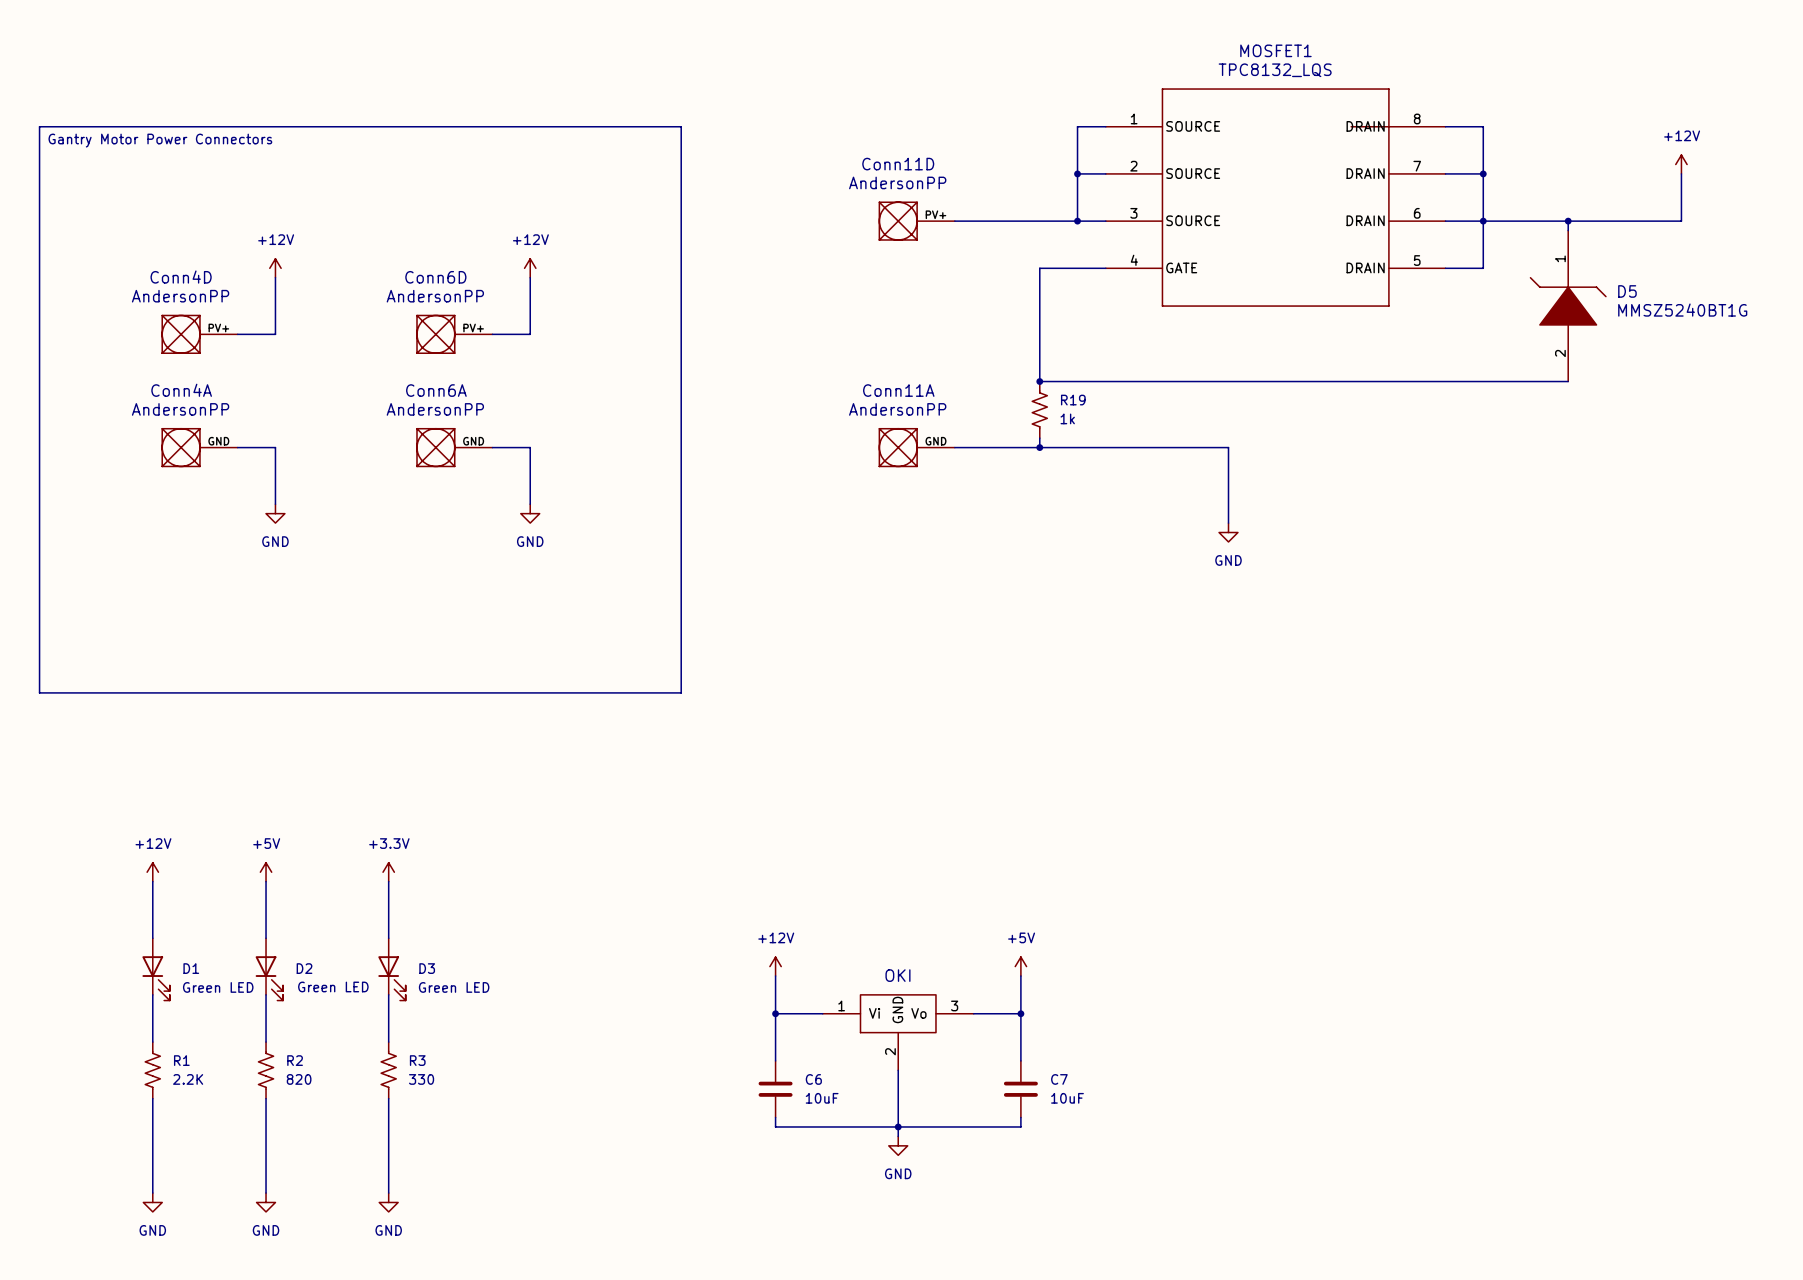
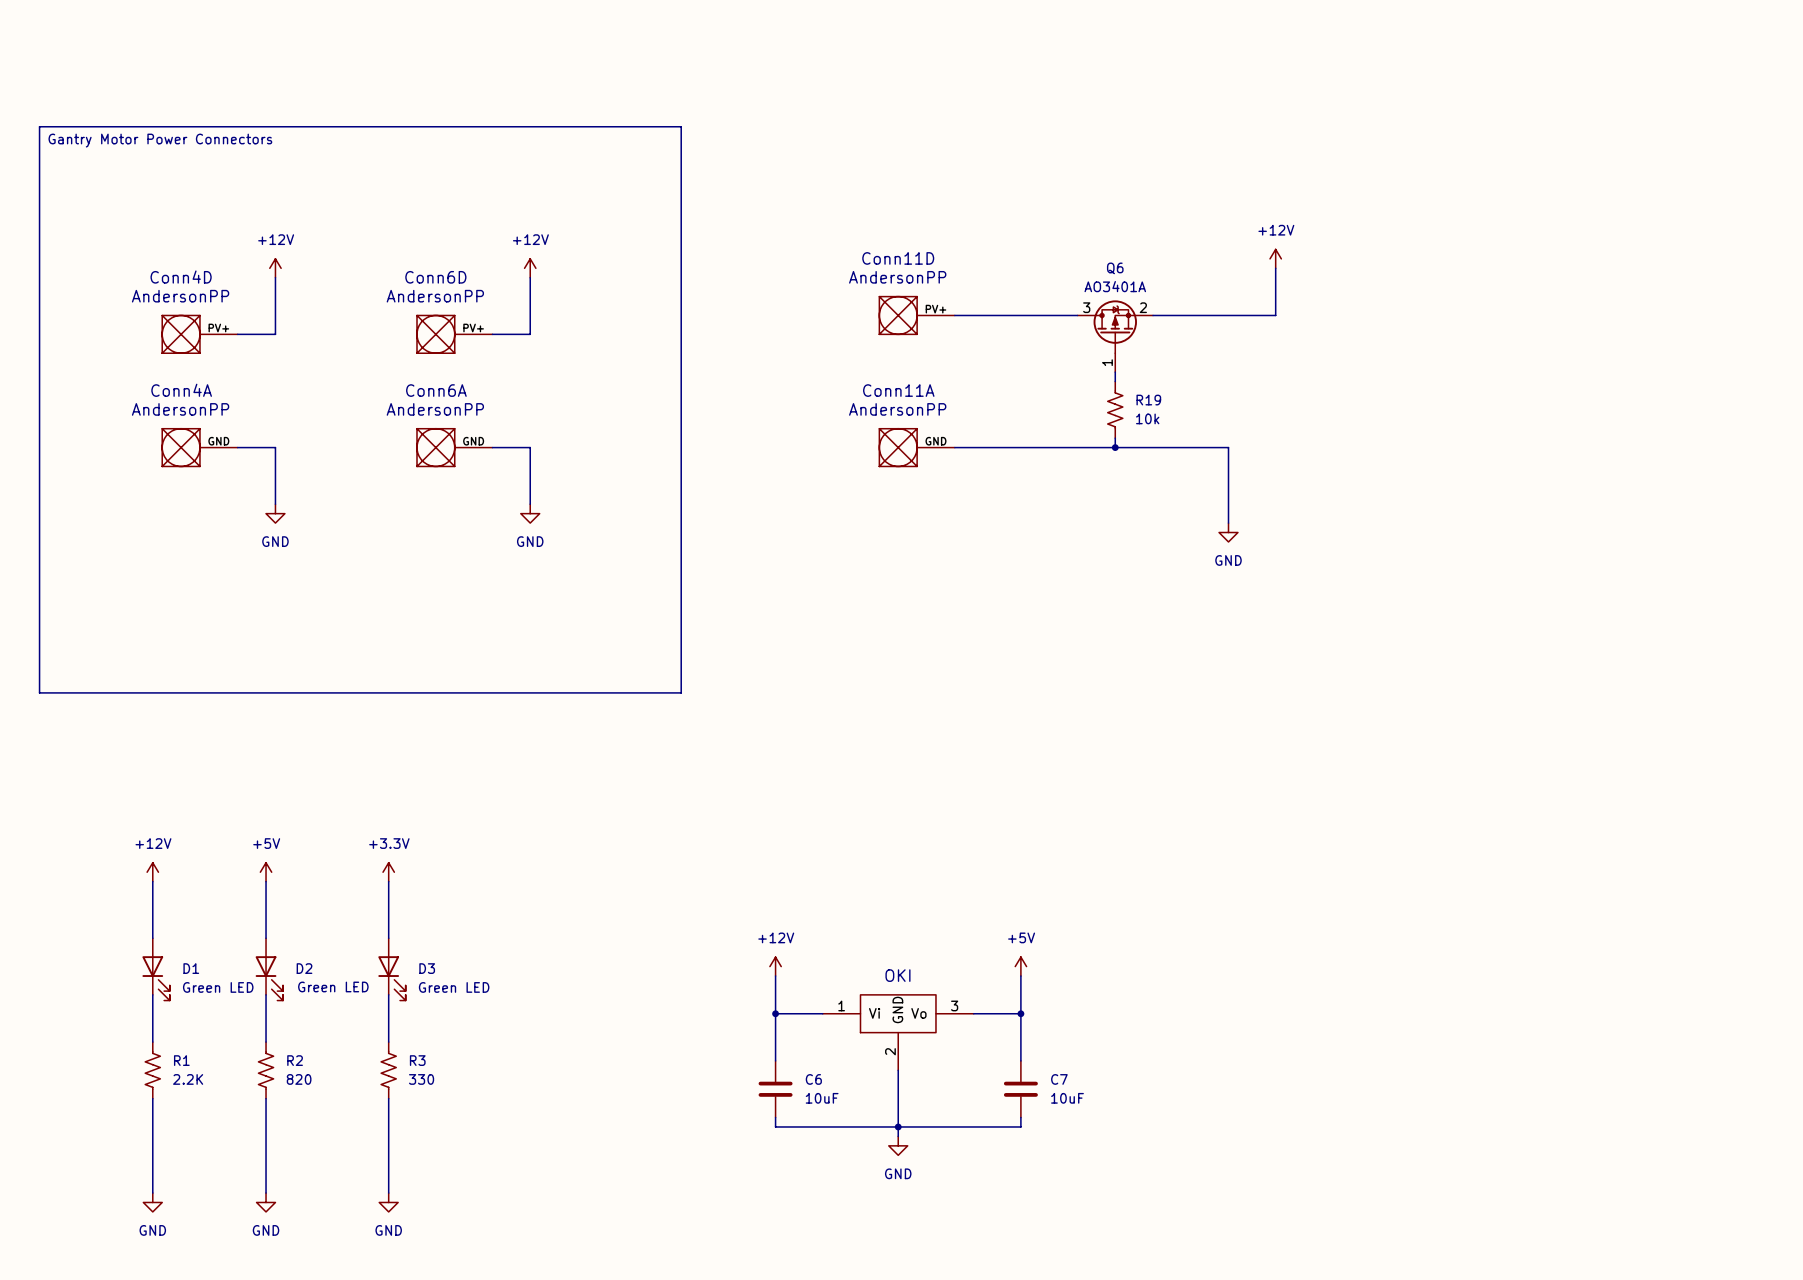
wire: (1105, 126) (1077, 126) (1077, 221) -> none
wire: (1445, 126) (1483, 126) (1483, 268) (1445, 268) -> none
power symbol: +12V (1681, 164) -> none
wire: (1077, 173) (1105, 173) -> none
junction: (1077, 173) -> none
wire: (1445, 173) (1483, 173) -> none
junction: (1483, 173) -> none
wire: (1681, 173) (1681, 221) (1445, 221) -> none
MOSFET1: TPC8132_LQS (1275, 197) -> none
Conn11D position: (917, 221) -> (917, 315)
wire: (954, 221) (1105, 221) -> none
junction: (1077, 221) -> none
junction: (1483, 221) -> none
wire: (1568, 221) (1568, 230) -> none
junction: (1568, 221) -> none
power symbol: none -> +12V (1275, 258)
wire: (1105, 268) (1039, 268) (1039, 381) (1568, 381) -> none
wire: none -> (1275, 268) (1275, 315) (1153, 315)
D5: MMSZ5240BT1G (1568, 306) -> none
wire: none -> (954, 315) (1077, 315)
Q6: none -> AO3401A (1115, 336)
wire: none -> (1115, 372) (1115, 381)
junction: (1039, 381) -> none
R19 position: (1039, 409) -> (1115, 409)
R19 value: 1k (1067, 418) -> 10k (1147, 418)
wire: (1039, 438) (1039, 447) -> (1115, 438) (1115, 447)
junction: (1039, 447) -> none
junction: none -> (1115, 447)

